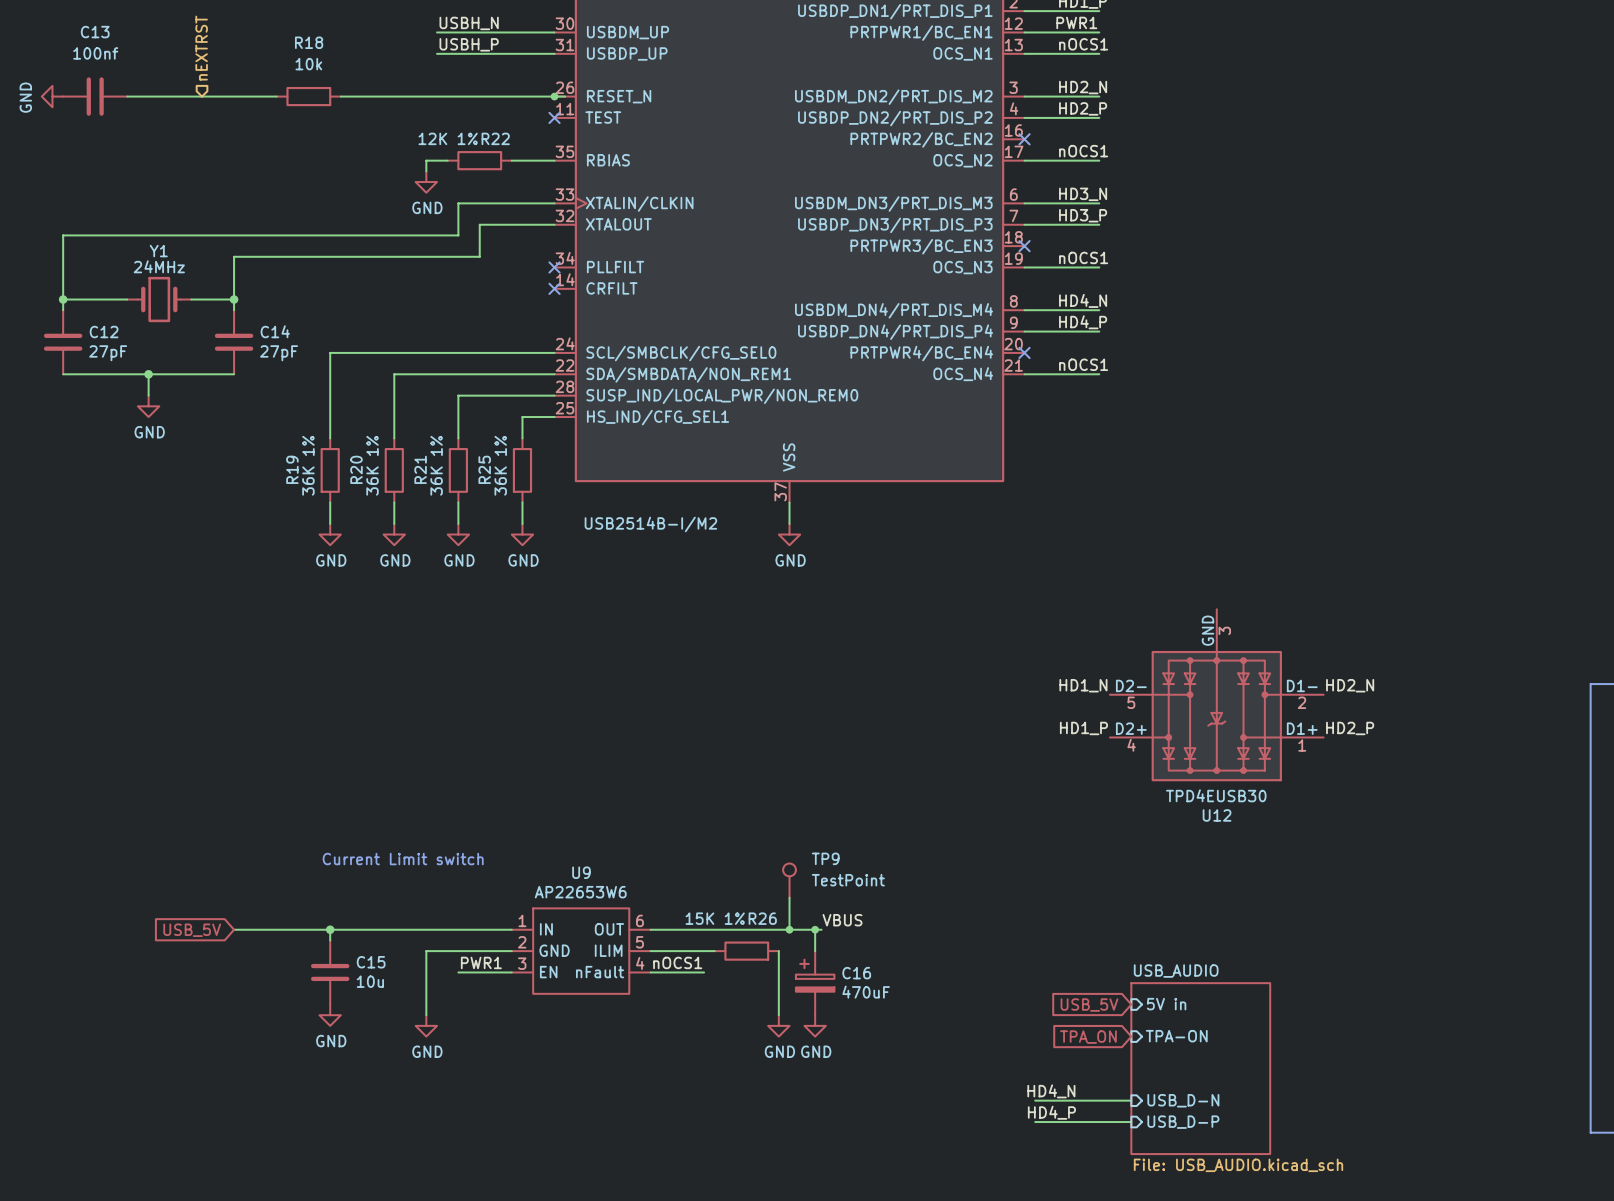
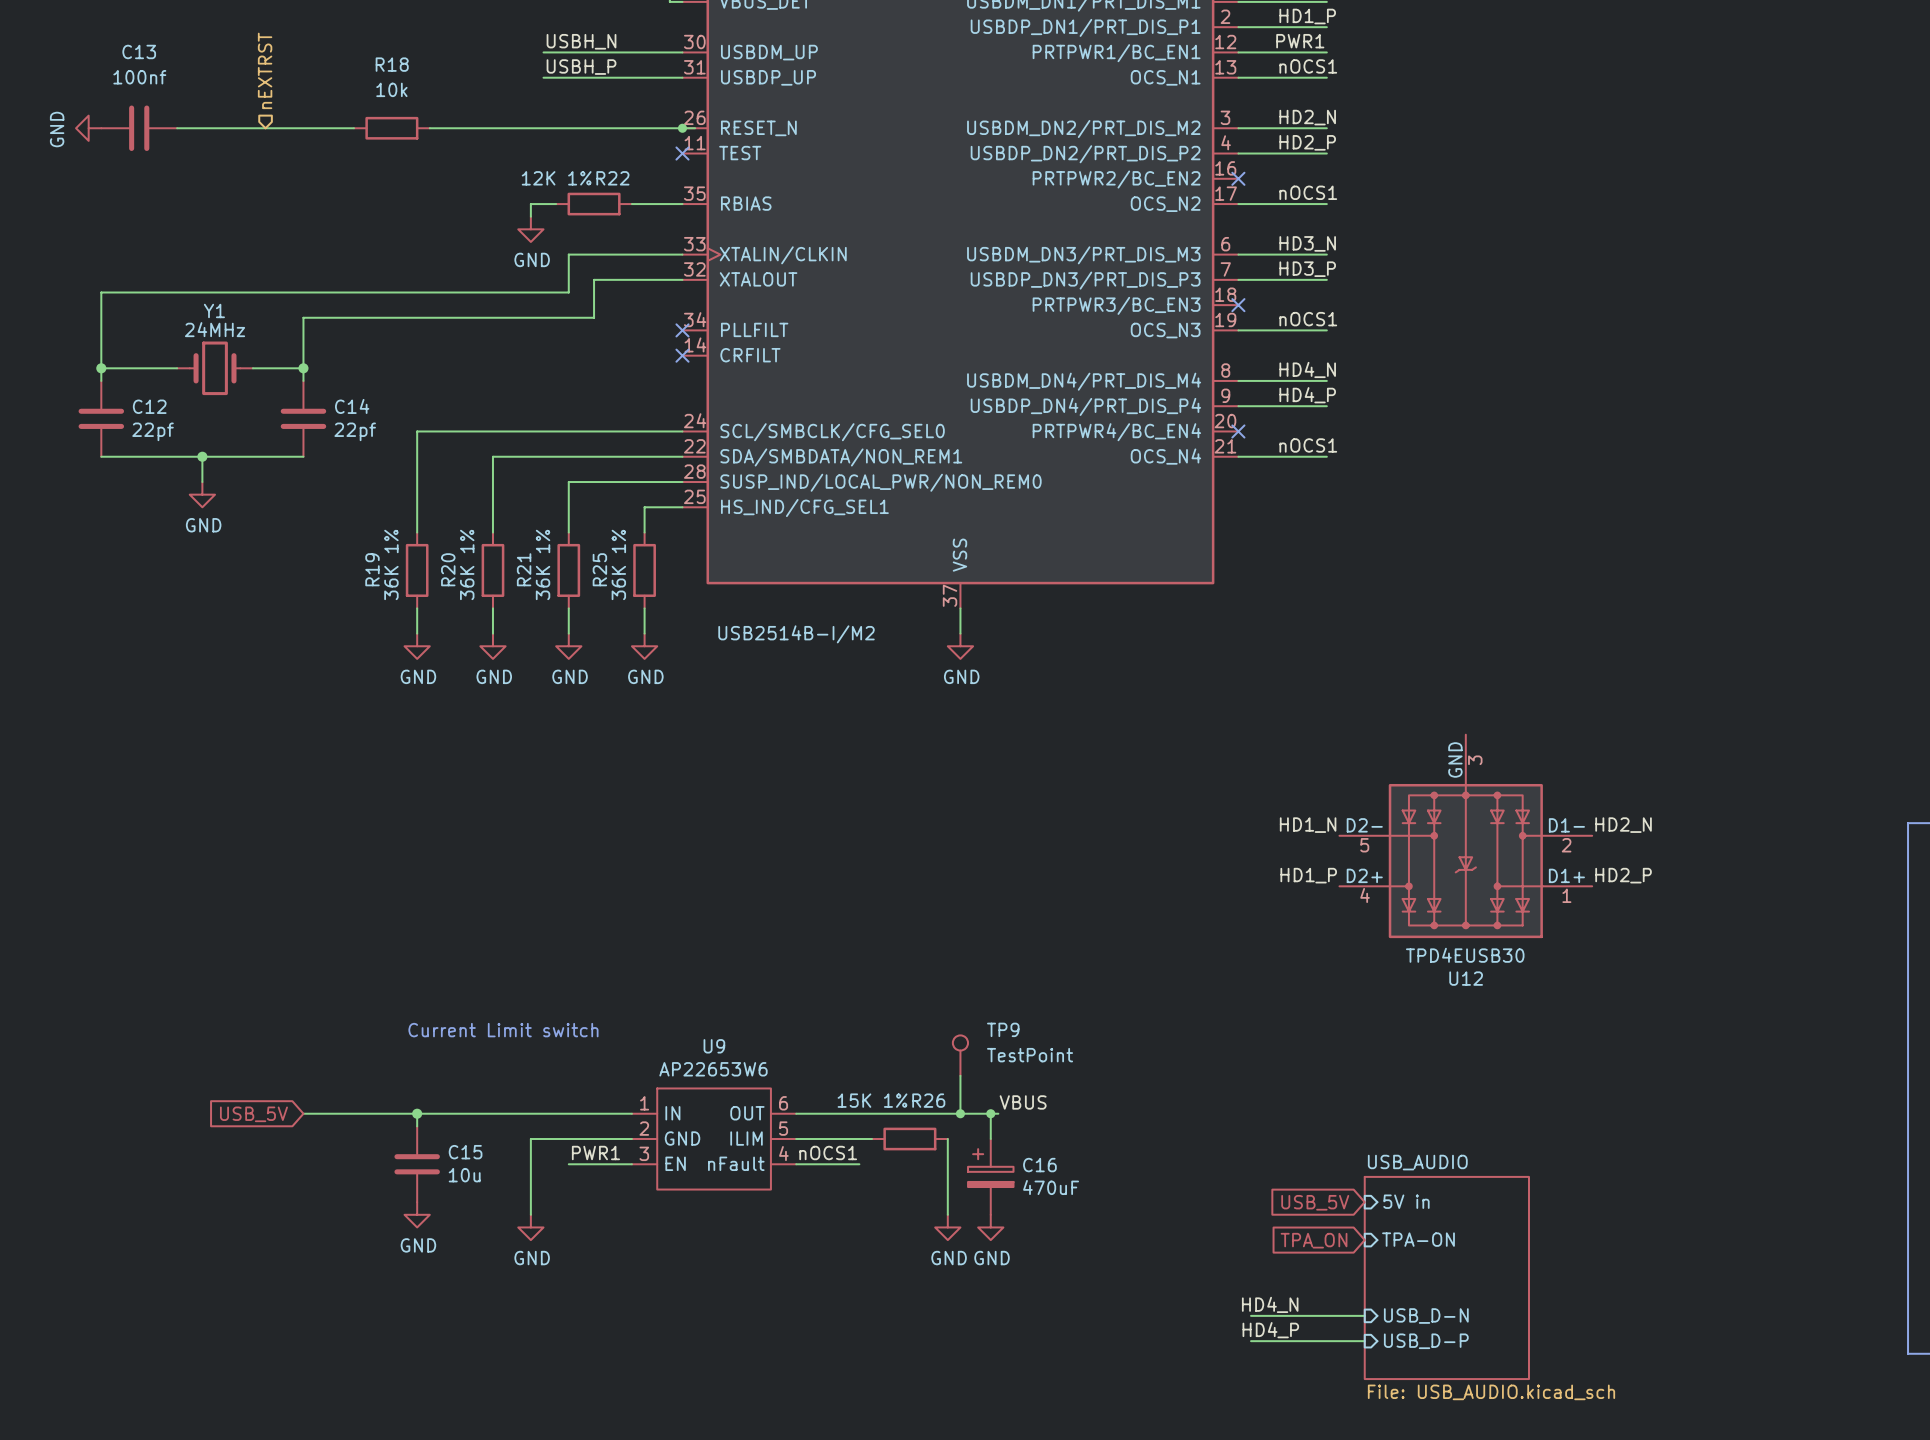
C12 value: 27pF (108, 353) -> 22pf (153, 431)
C14 value: 27pF (279, 353) -> 22pf (355, 431)

